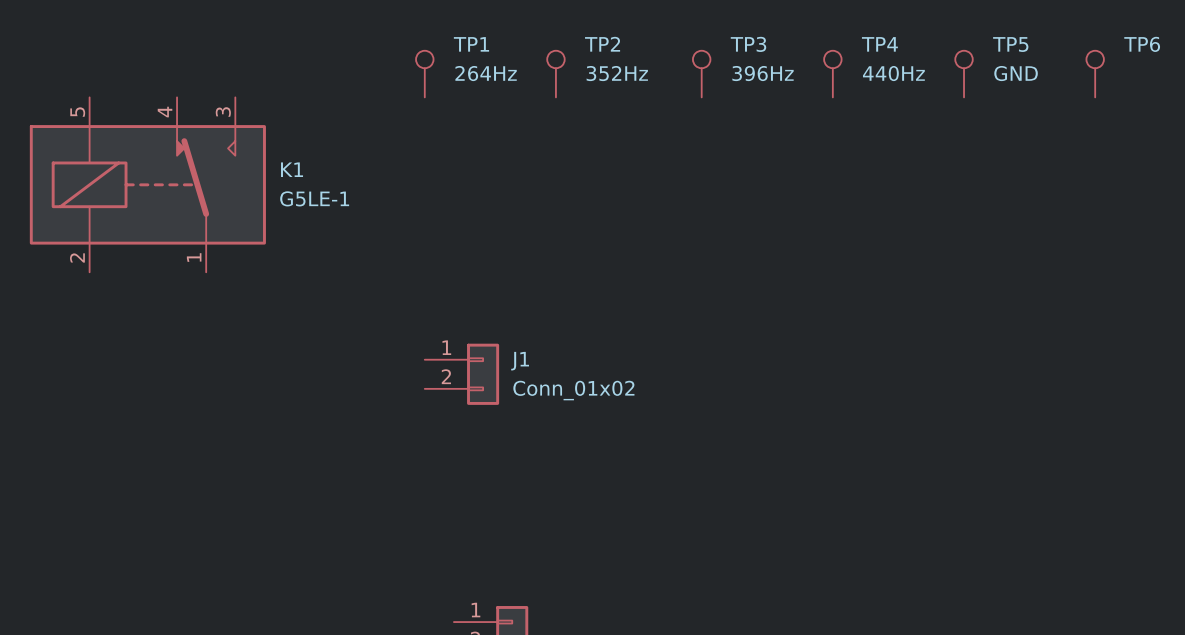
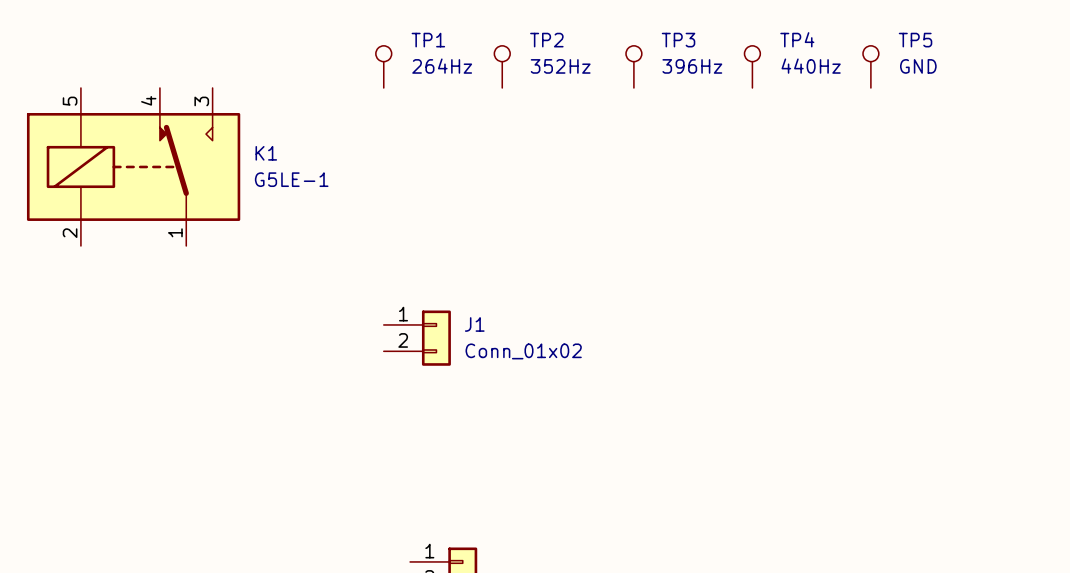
TP6: (1095, 74) -> none

